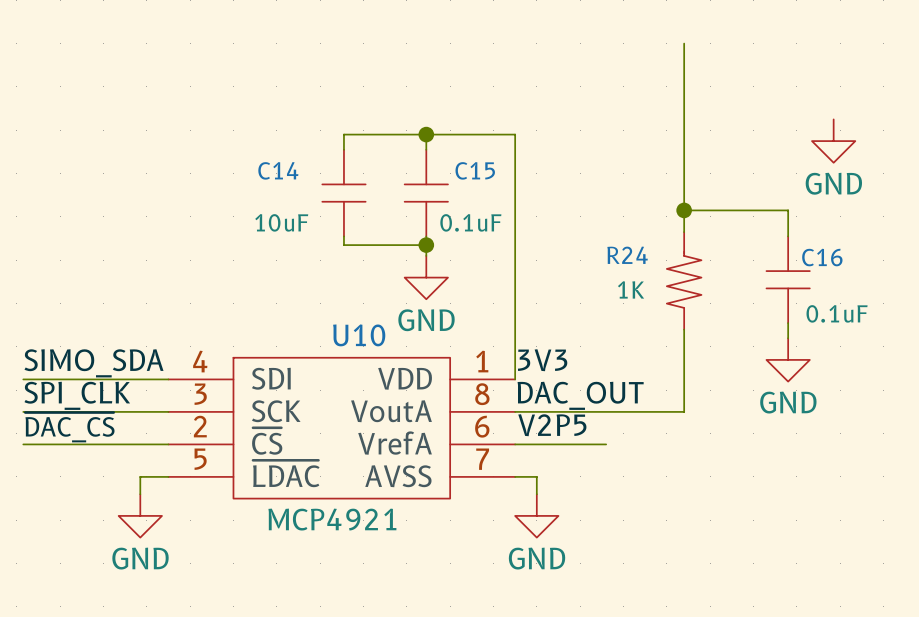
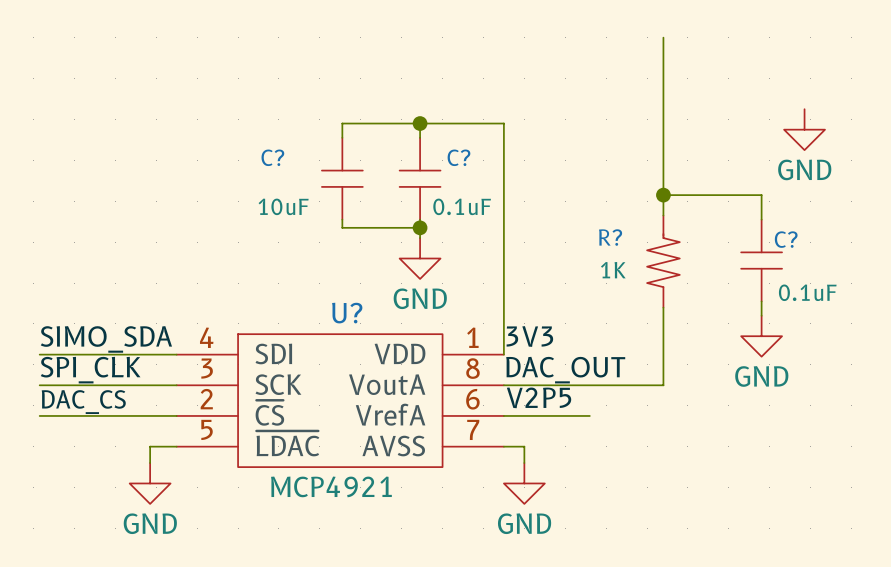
C14 name: C14 (278, 170) -> C? (272, 157)
C15 name: C15 (475, 170) -> C? (458, 157)
R24 name: R24 (627, 255) -> R? (610, 237)
C16 name: C16 (822, 257) -> C? (786, 239)
U10 name: U10 (359, 335) -> U? (347, 313)
label: ~{DAC_CS} (69, 427) -> DAC_CS (83, 402)

